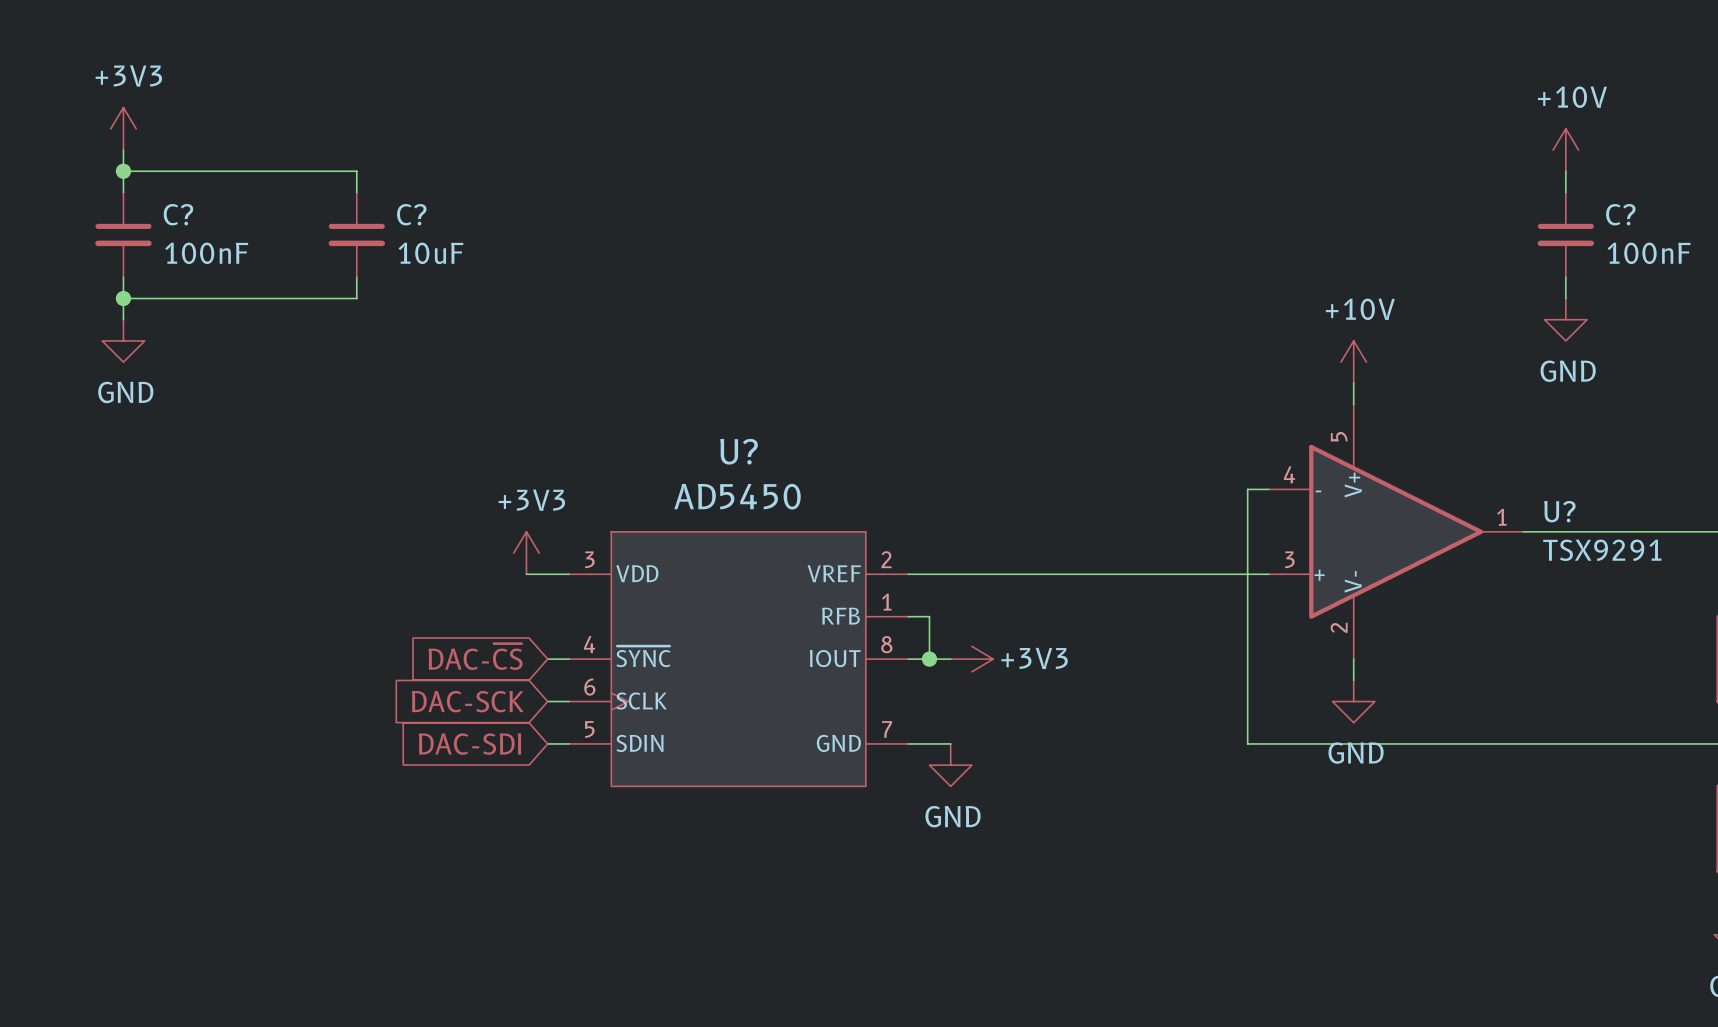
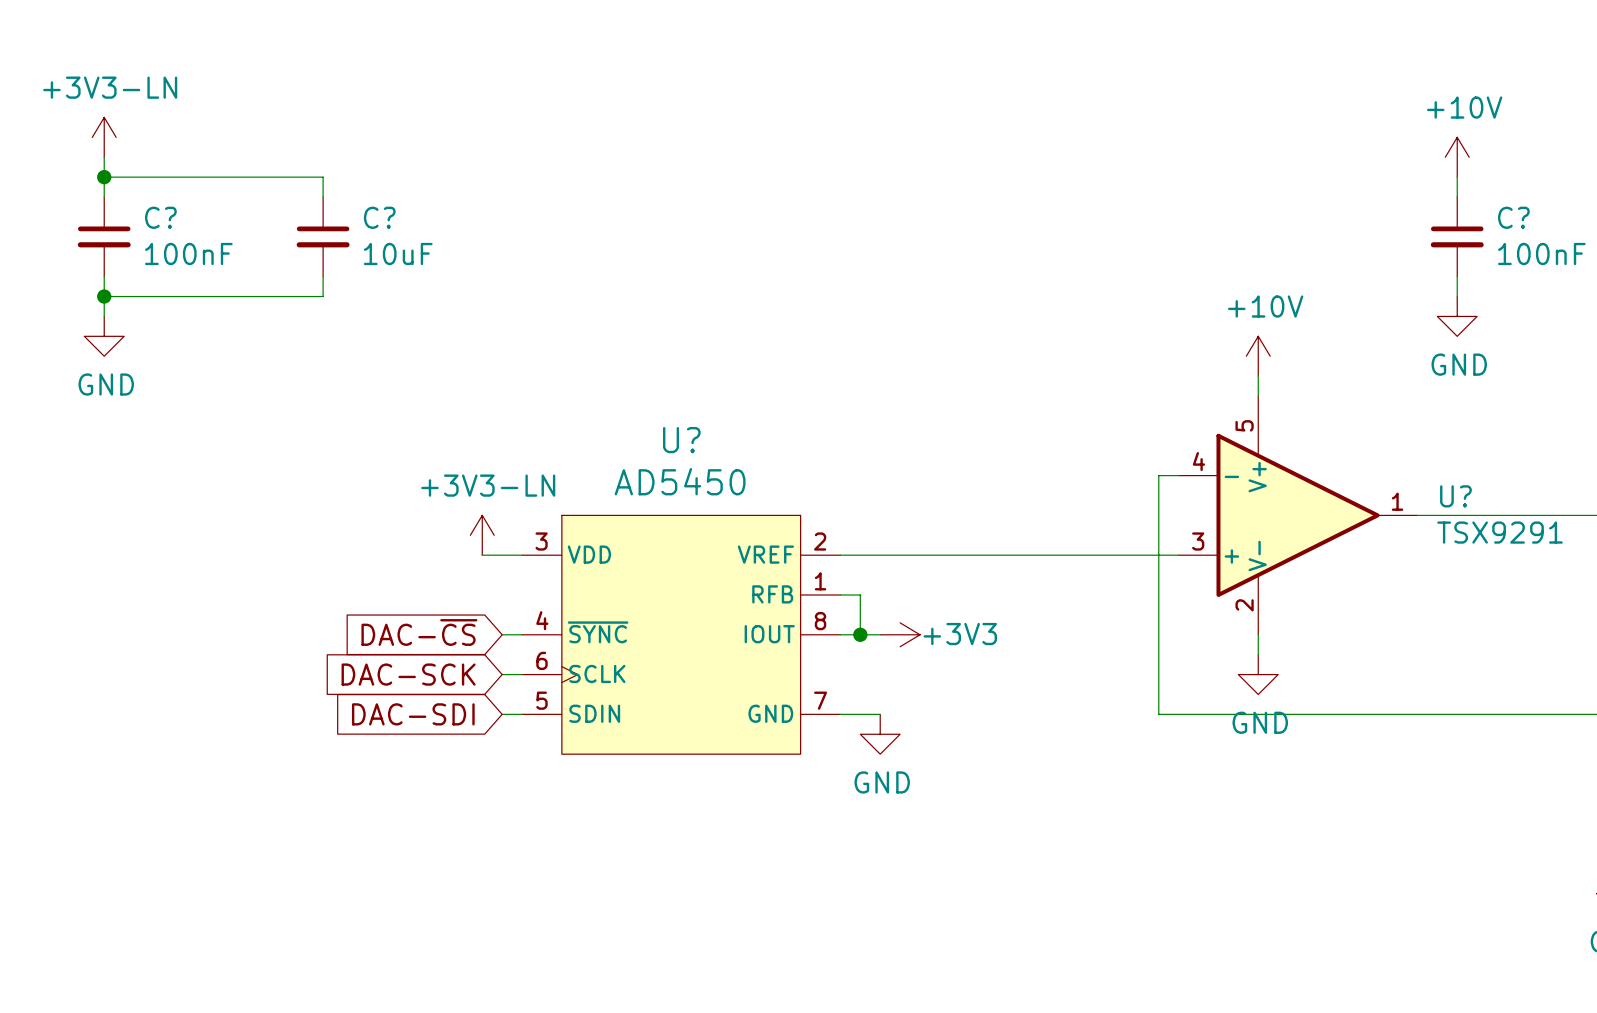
power symbol: +3V3 (123, 128) -> +3V3-LN (104, 137)
power symbol: +3V3 (526, 553) -> +3V3-LN (482, 535)

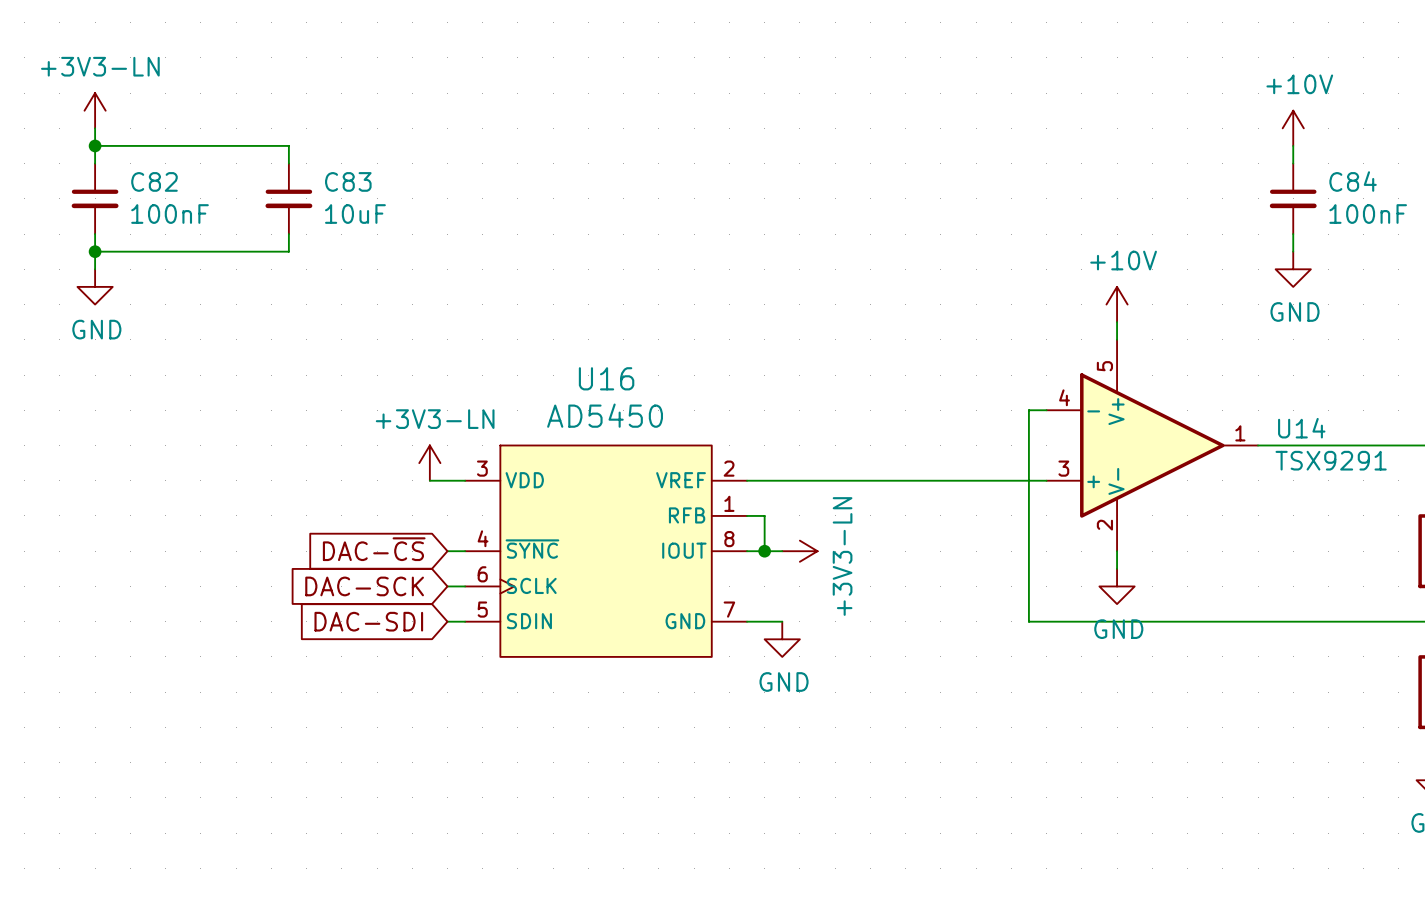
C? name: C? (160, 217) -> C82 (154, 181)
C? name: C? (379, 217) -> C83 (348, 181)
C? name: C? (1513, 217) -> C84 (1353, 181)
U? name: U? (681, 440) -> U16 (606, 378)
U? name: U? (1455, 496) -> U14 (1301, 428)
power symbol: +3V3 (900, 634) -> +3V3-LN (799, 551)

